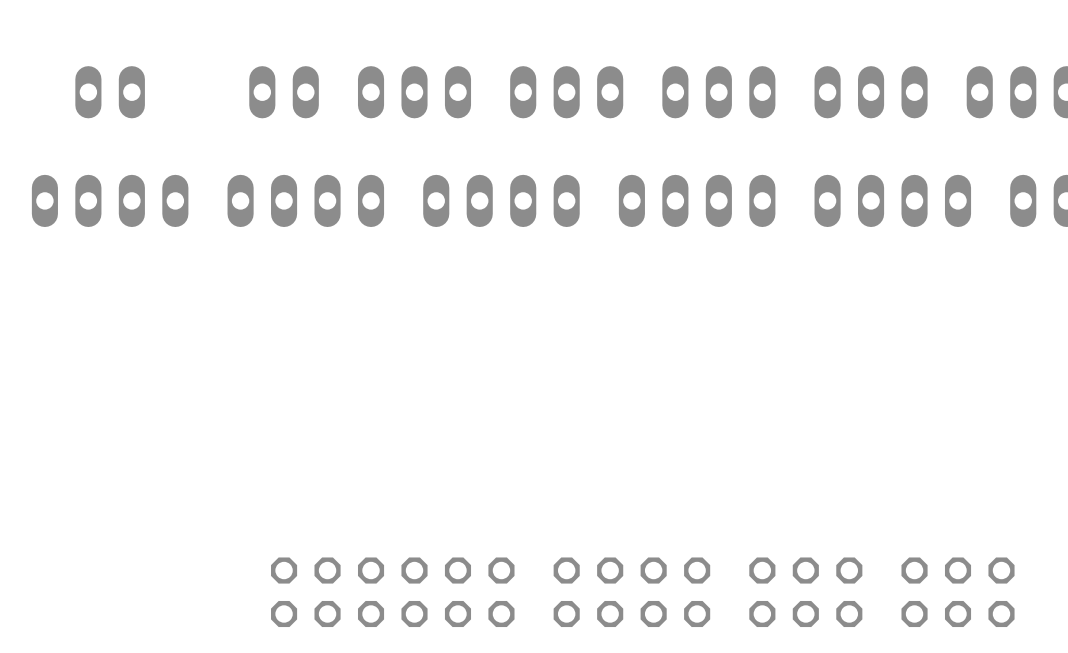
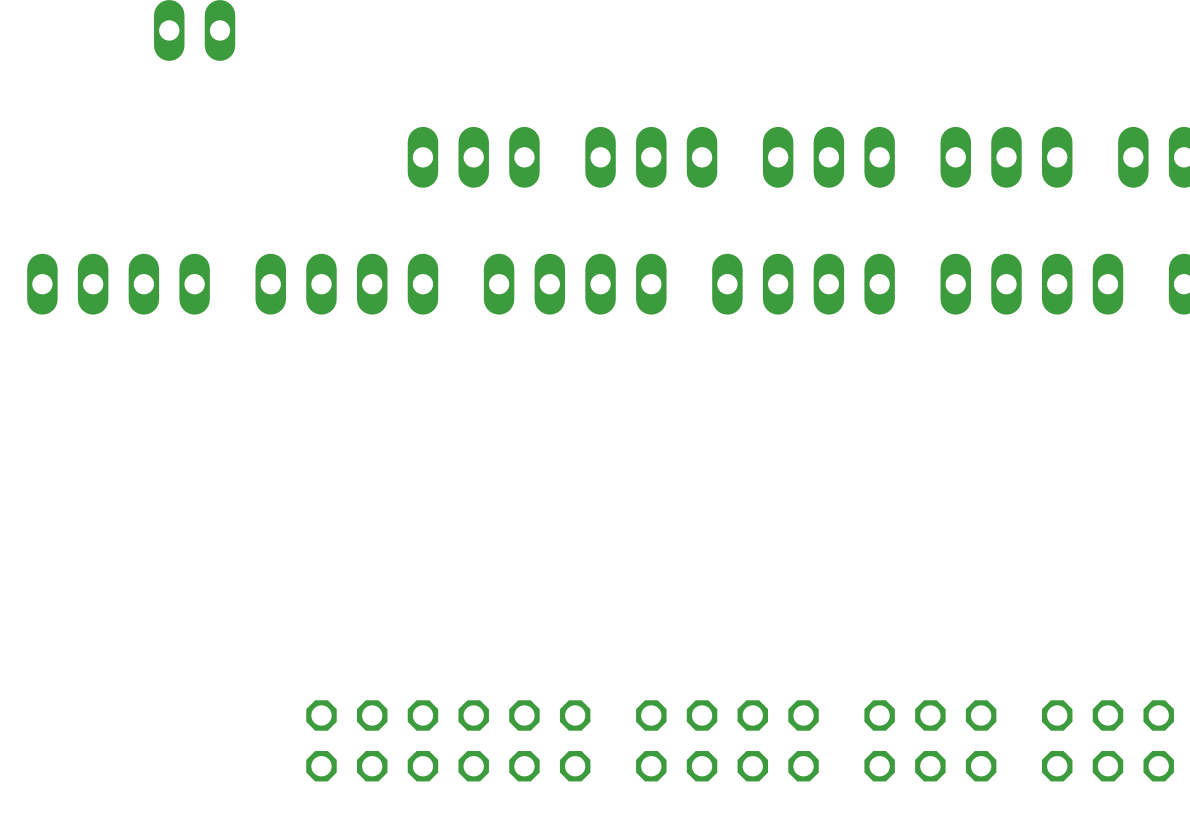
part: (110, 92) -> none
part: (284, 92) -> none

